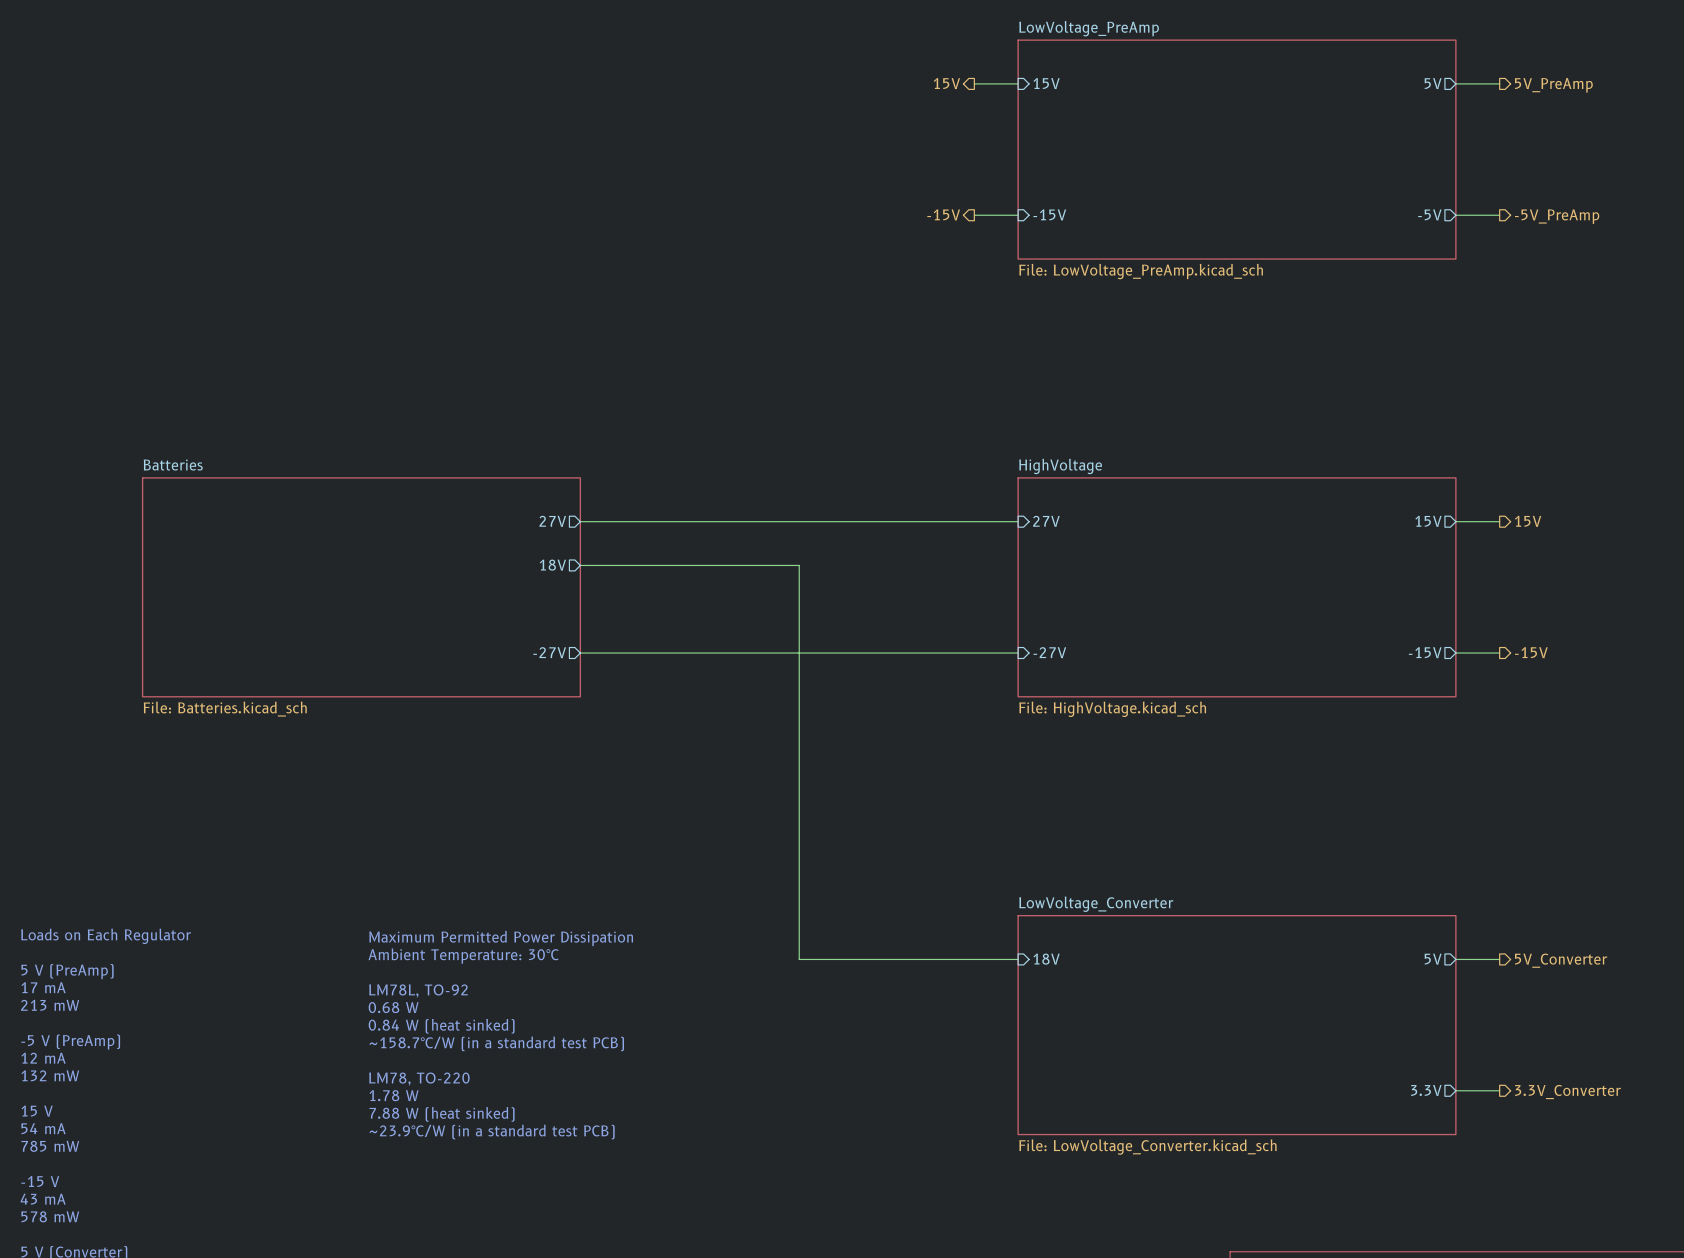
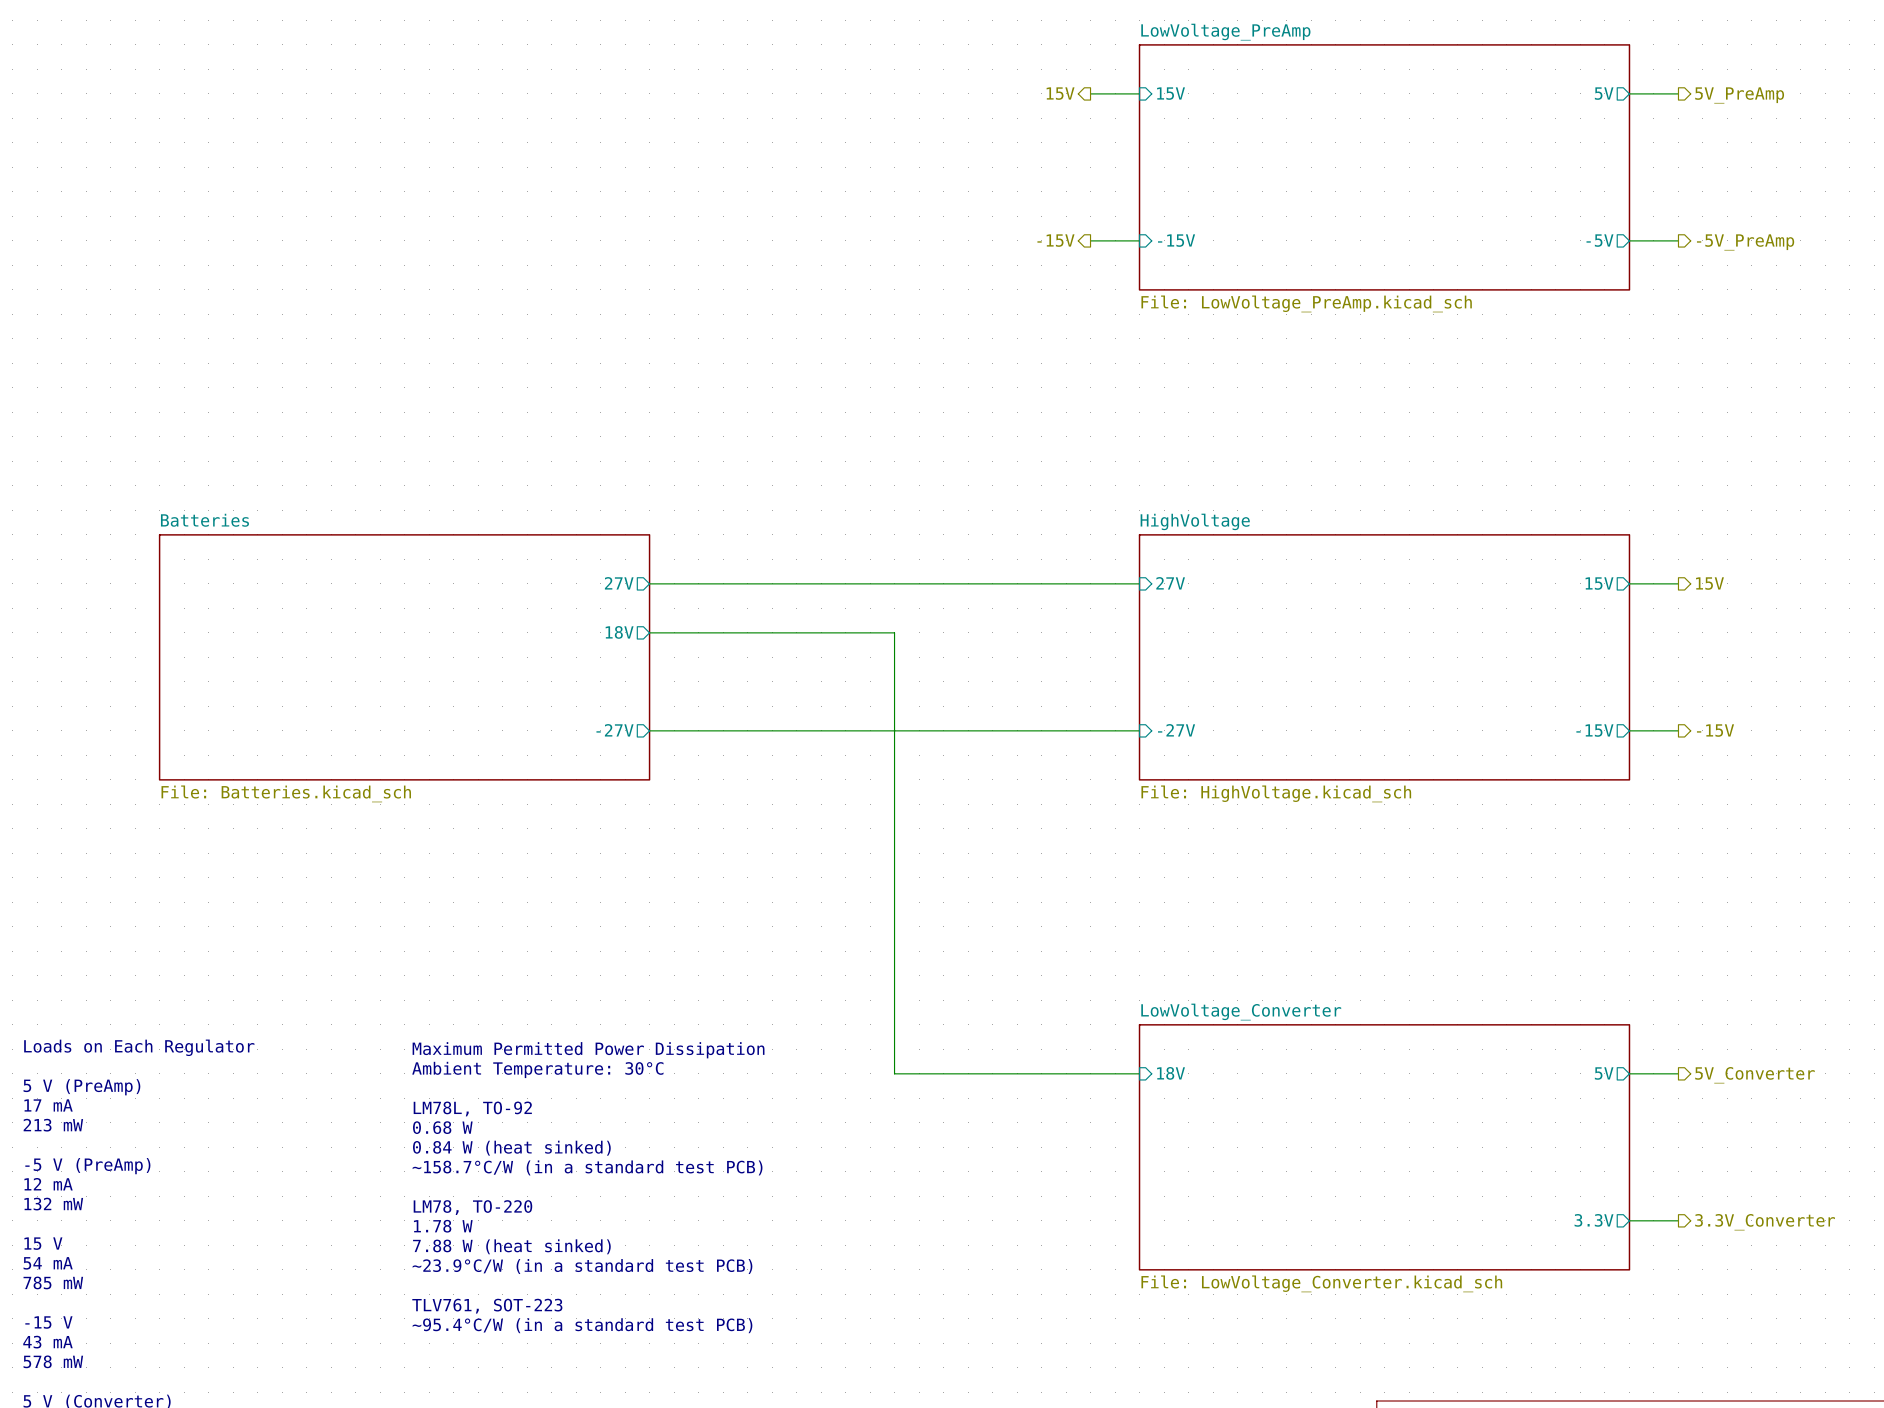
text: none -> TLV761, SOT-223 (487, 1306)
text: none -> ~95.4°C/W (in a standard test PCB) (582, 1325)

